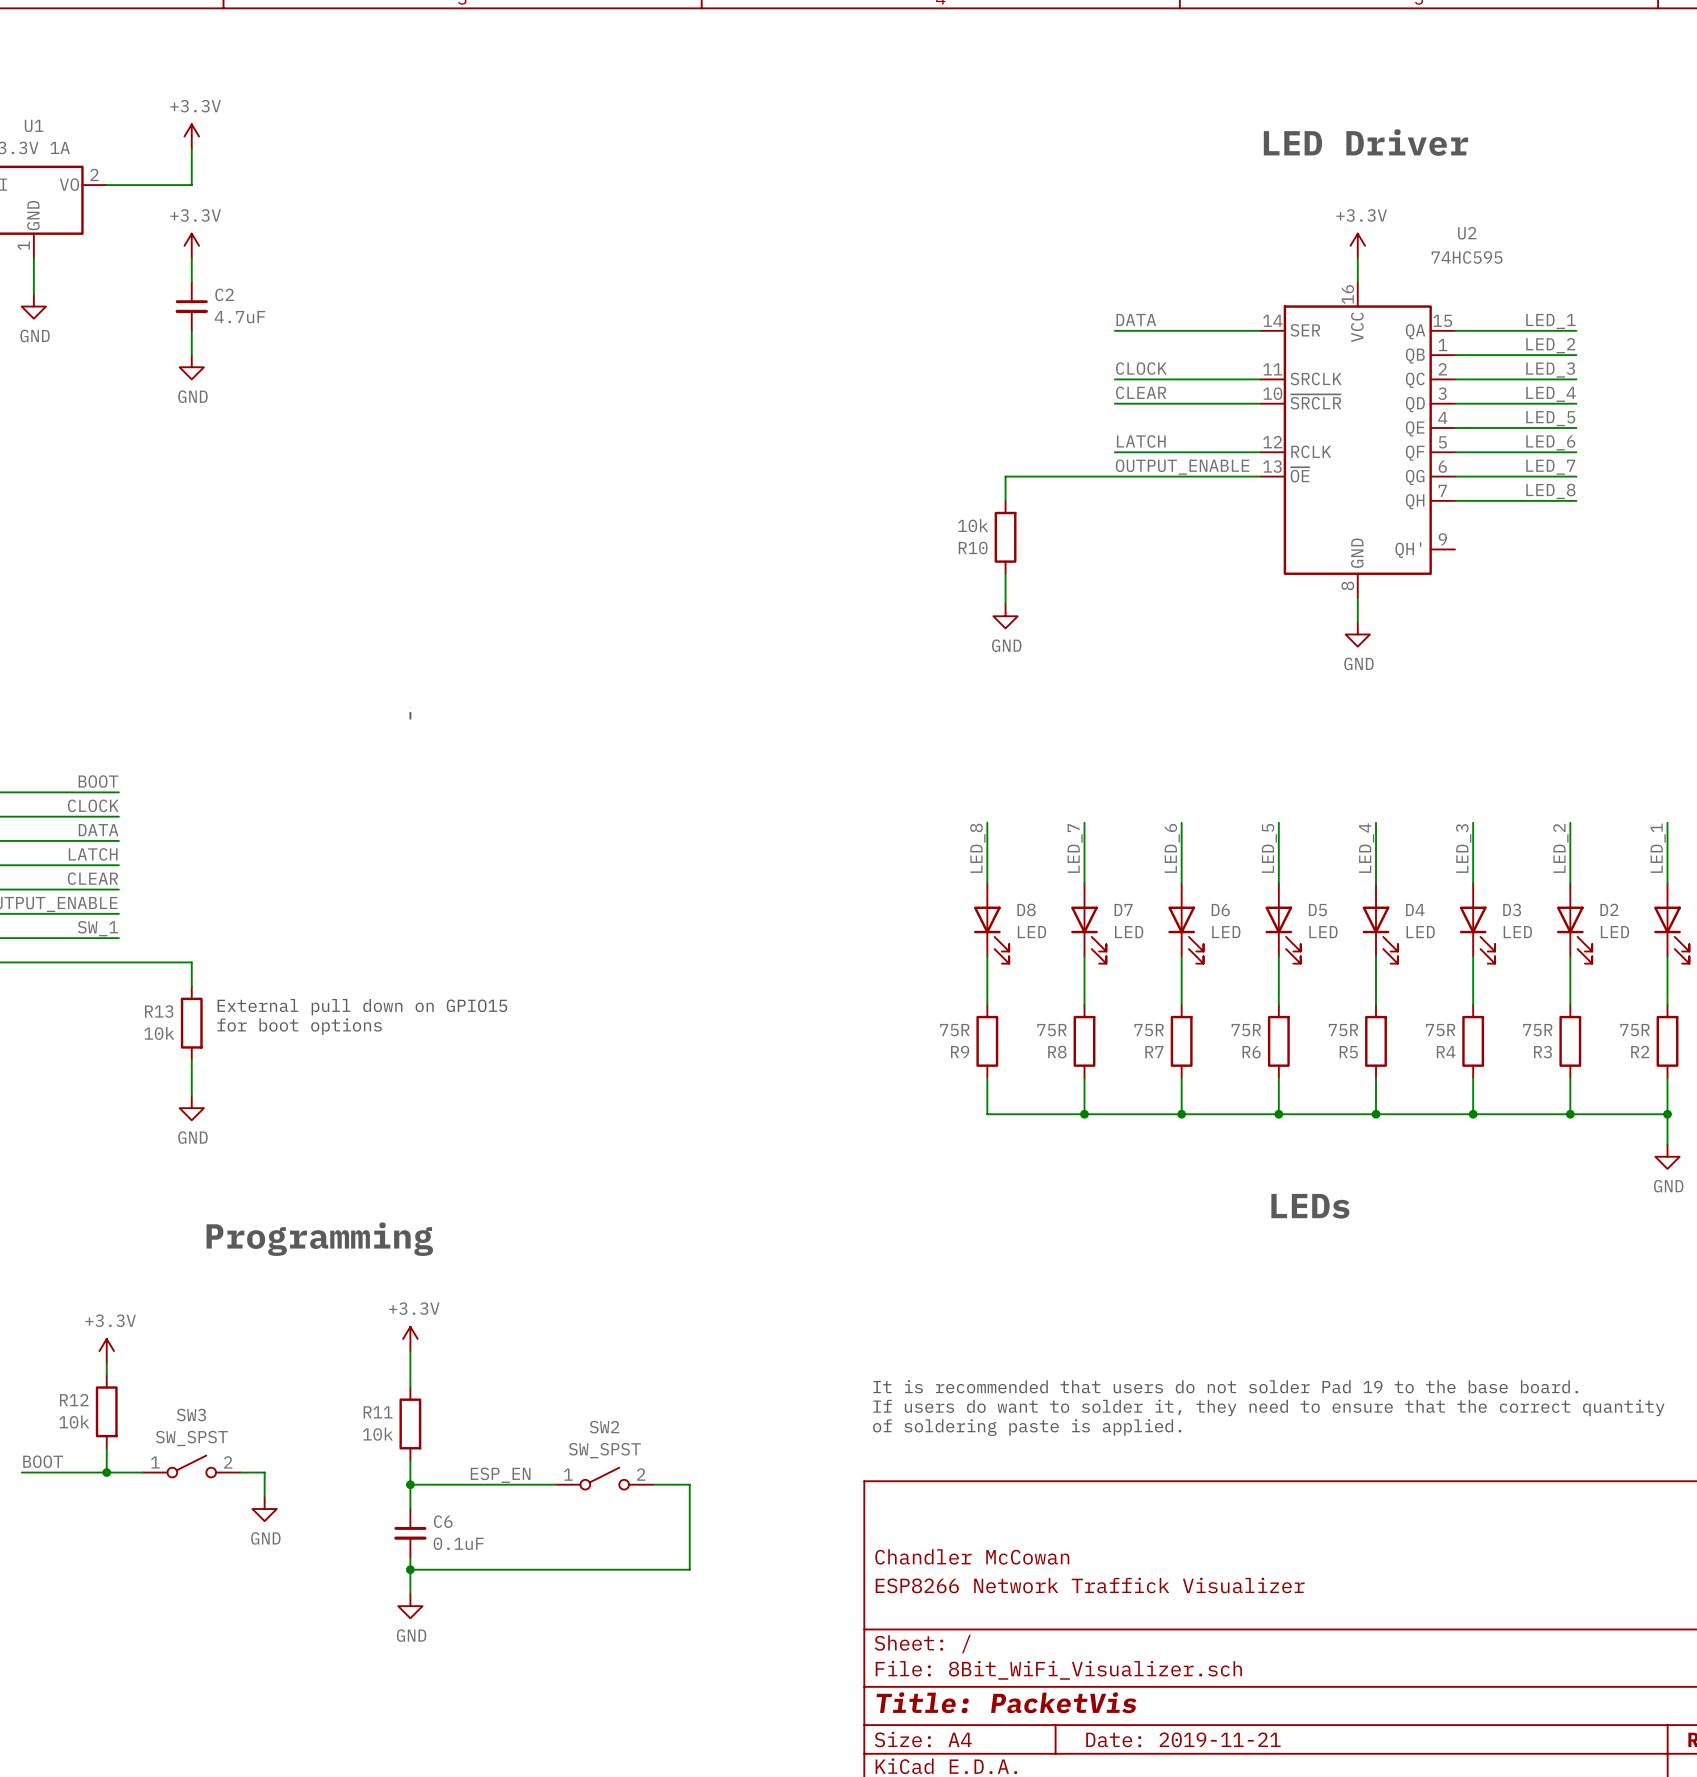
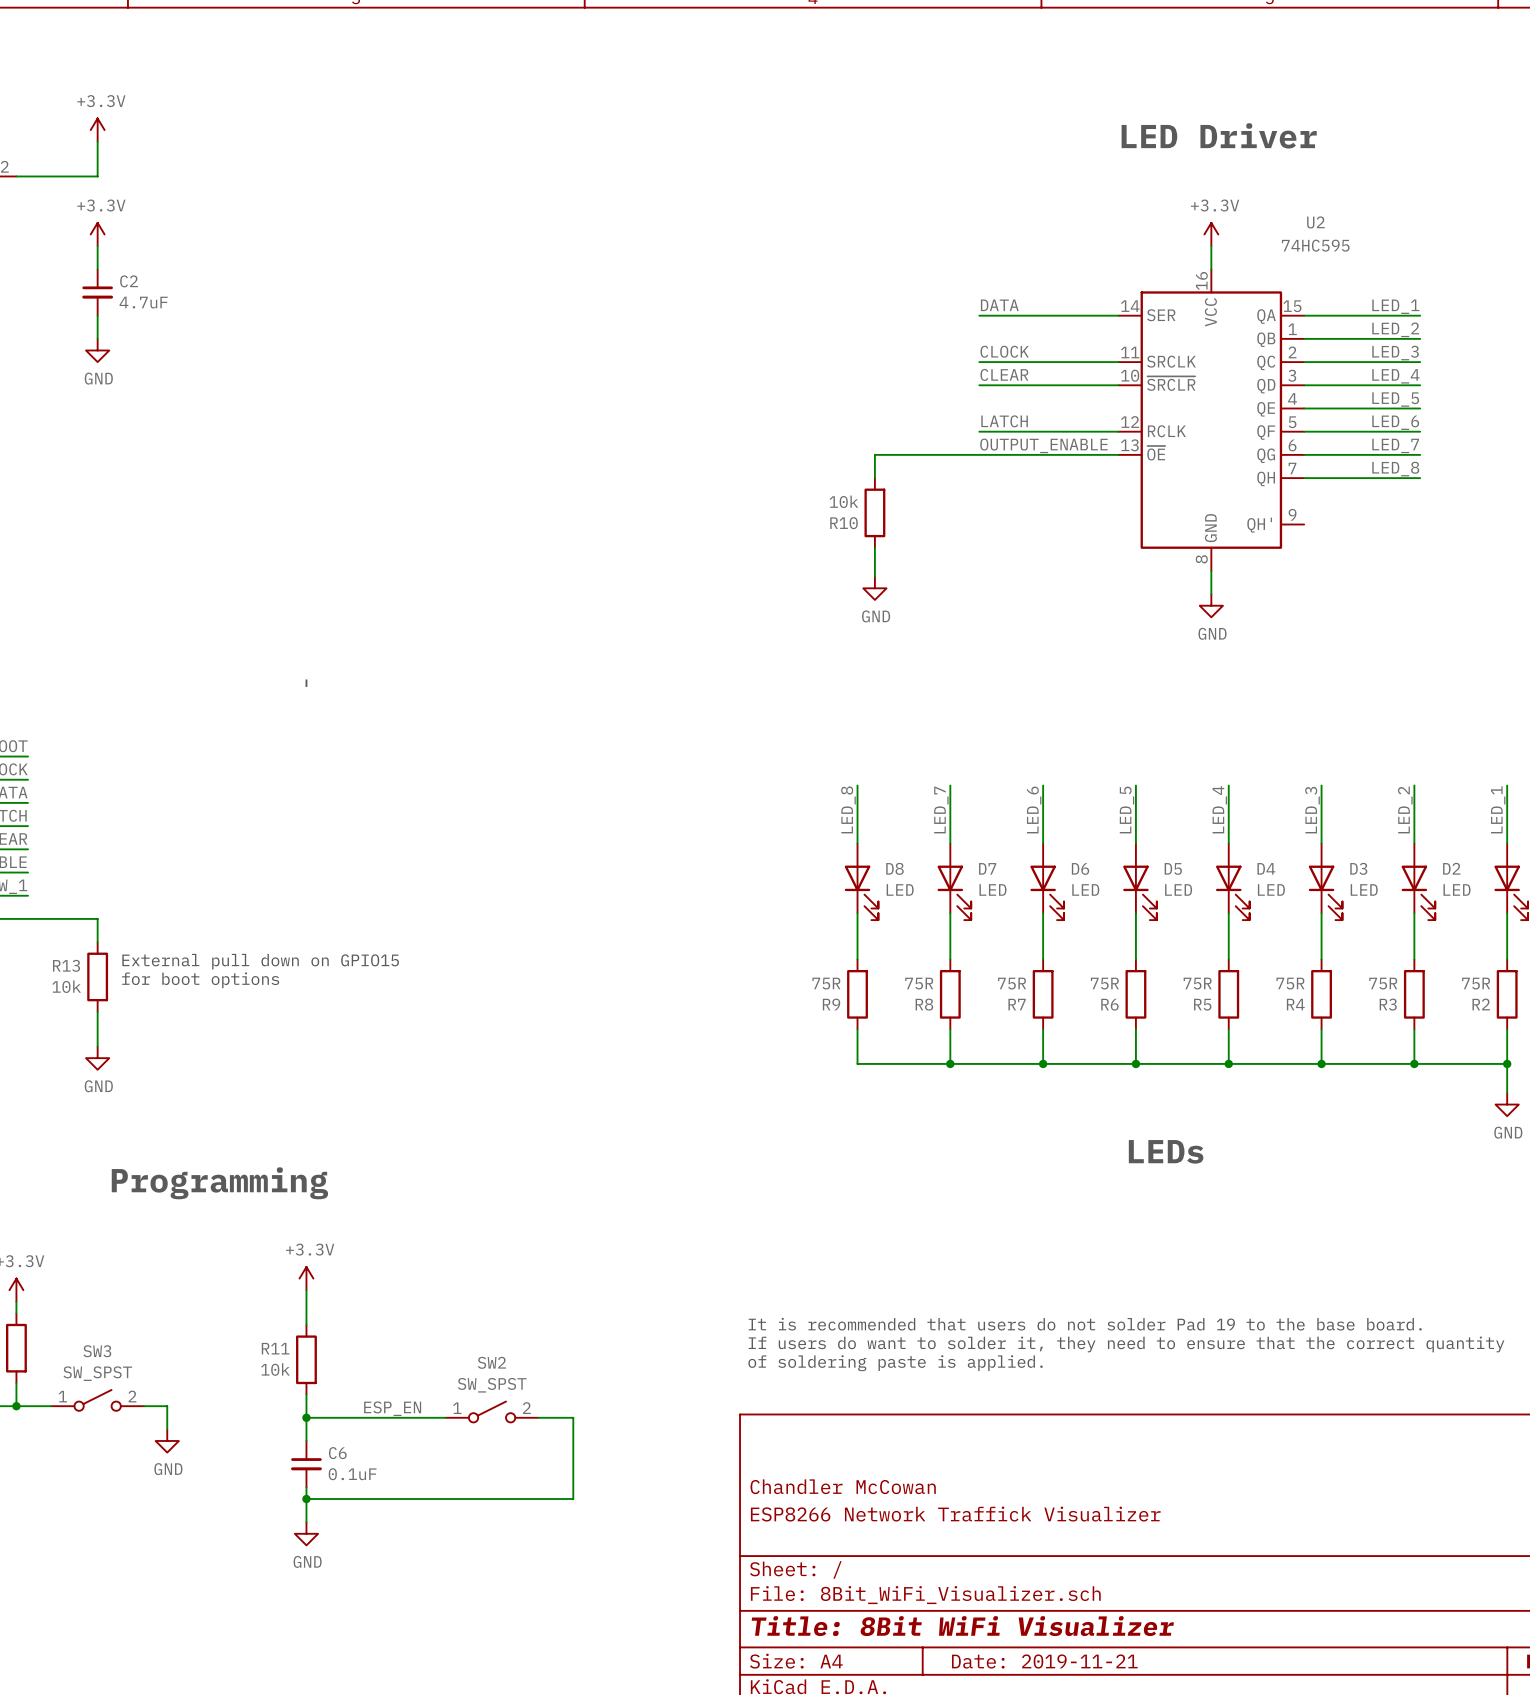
title block: Title: PacketVis (1006, 1702) -> Title: 8Bit WiFi Visualizer (962, 1626)

